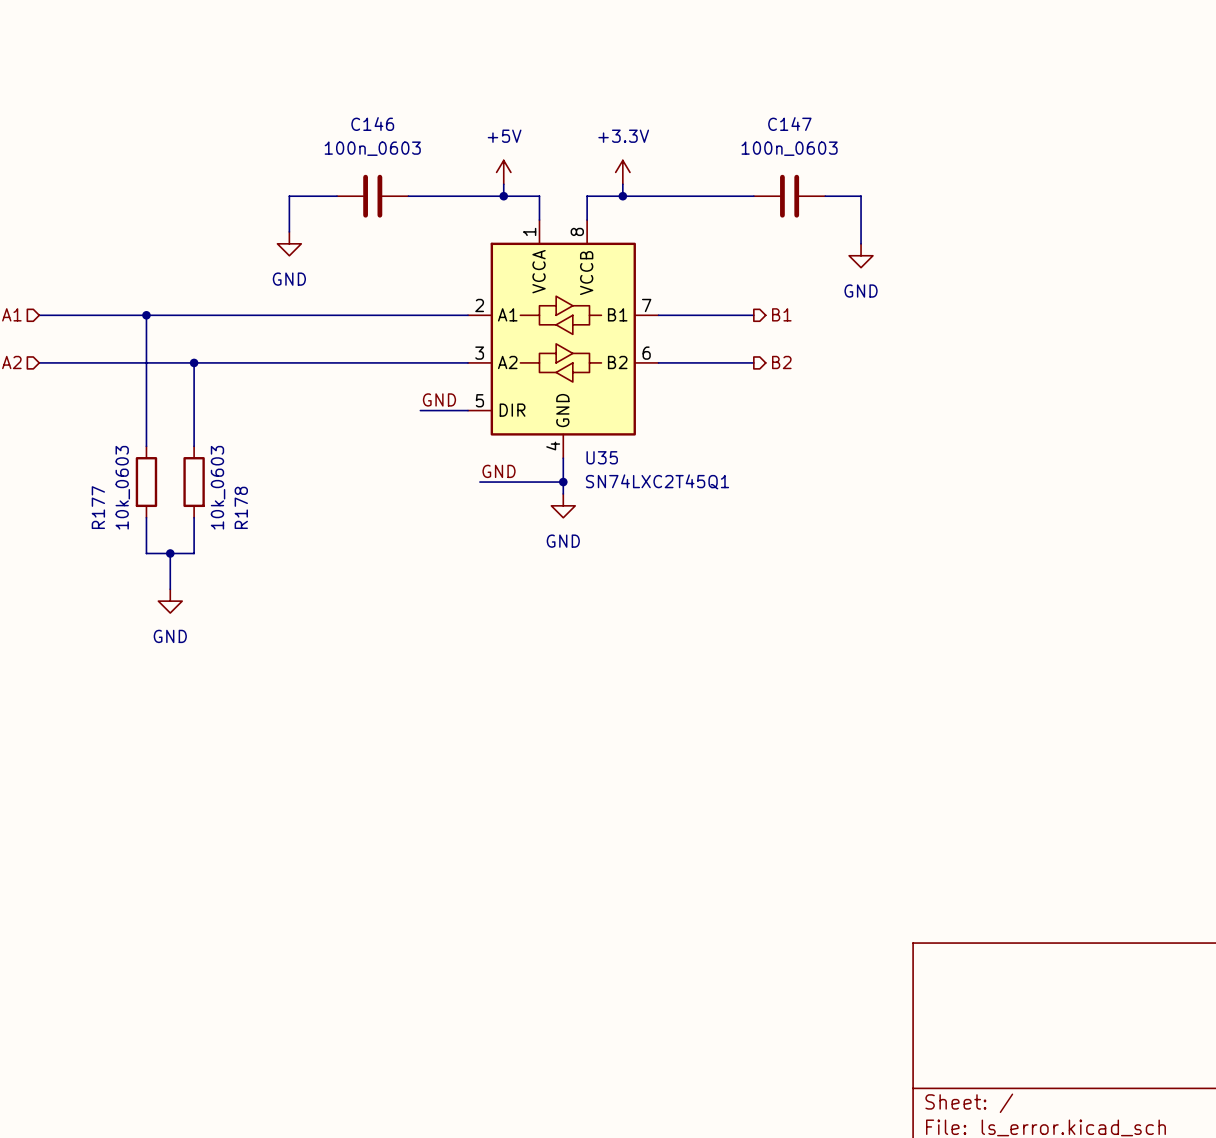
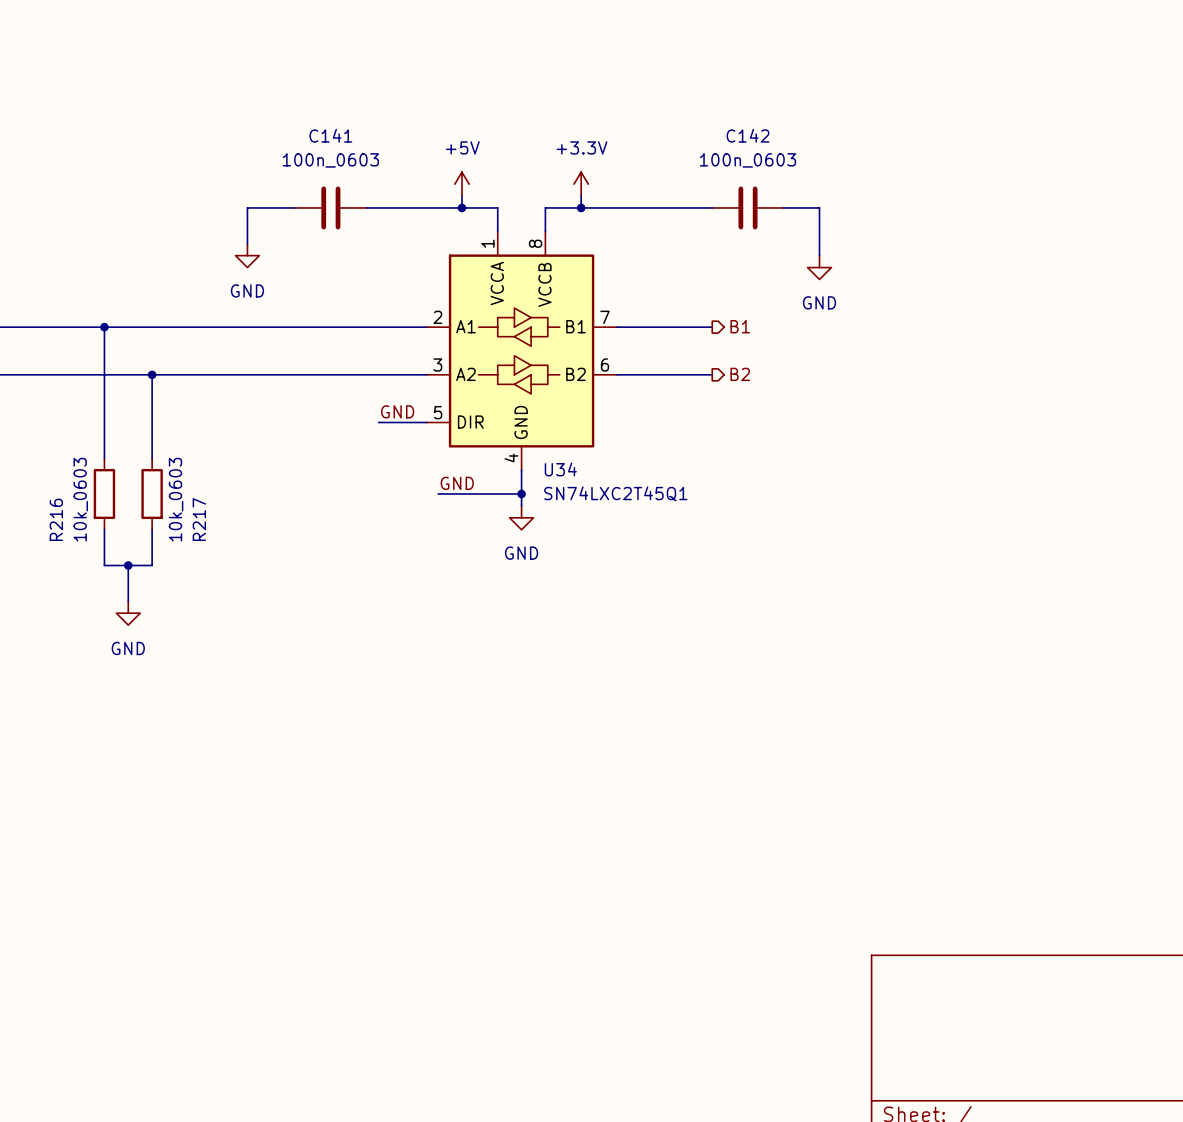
C146 name: C146 (372, 124) -> C141 (330, 135)
C147 name: C147 (789, 124) -> C142 (748, 135)
U35 name: U35 (602, 457) -> U34 (560, 469)
R177 name: R177 (98, 507) -> R216 (56, 519)
R178 name: R178 (241, 507) -> R217 (199, 519)

